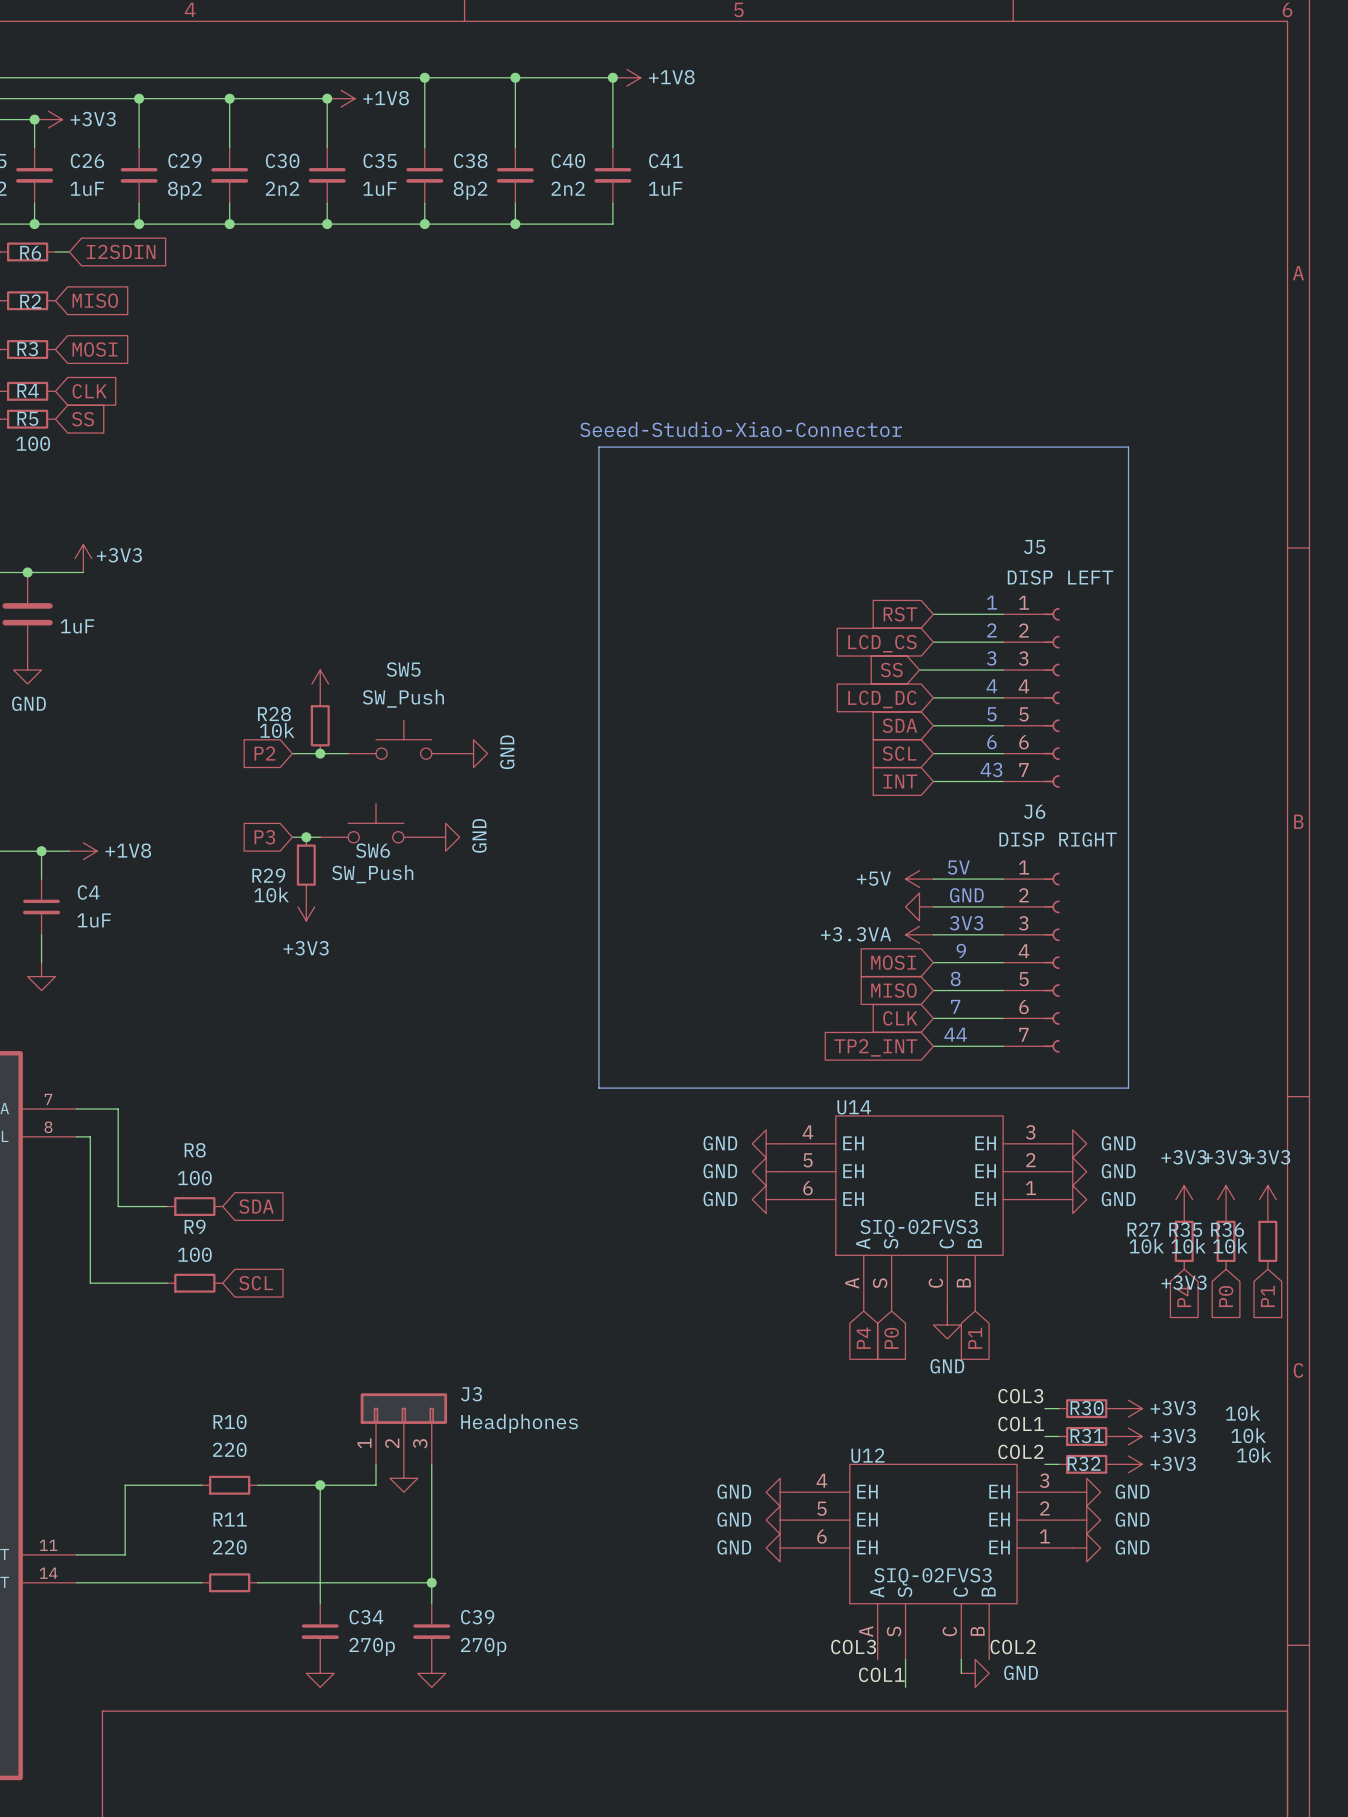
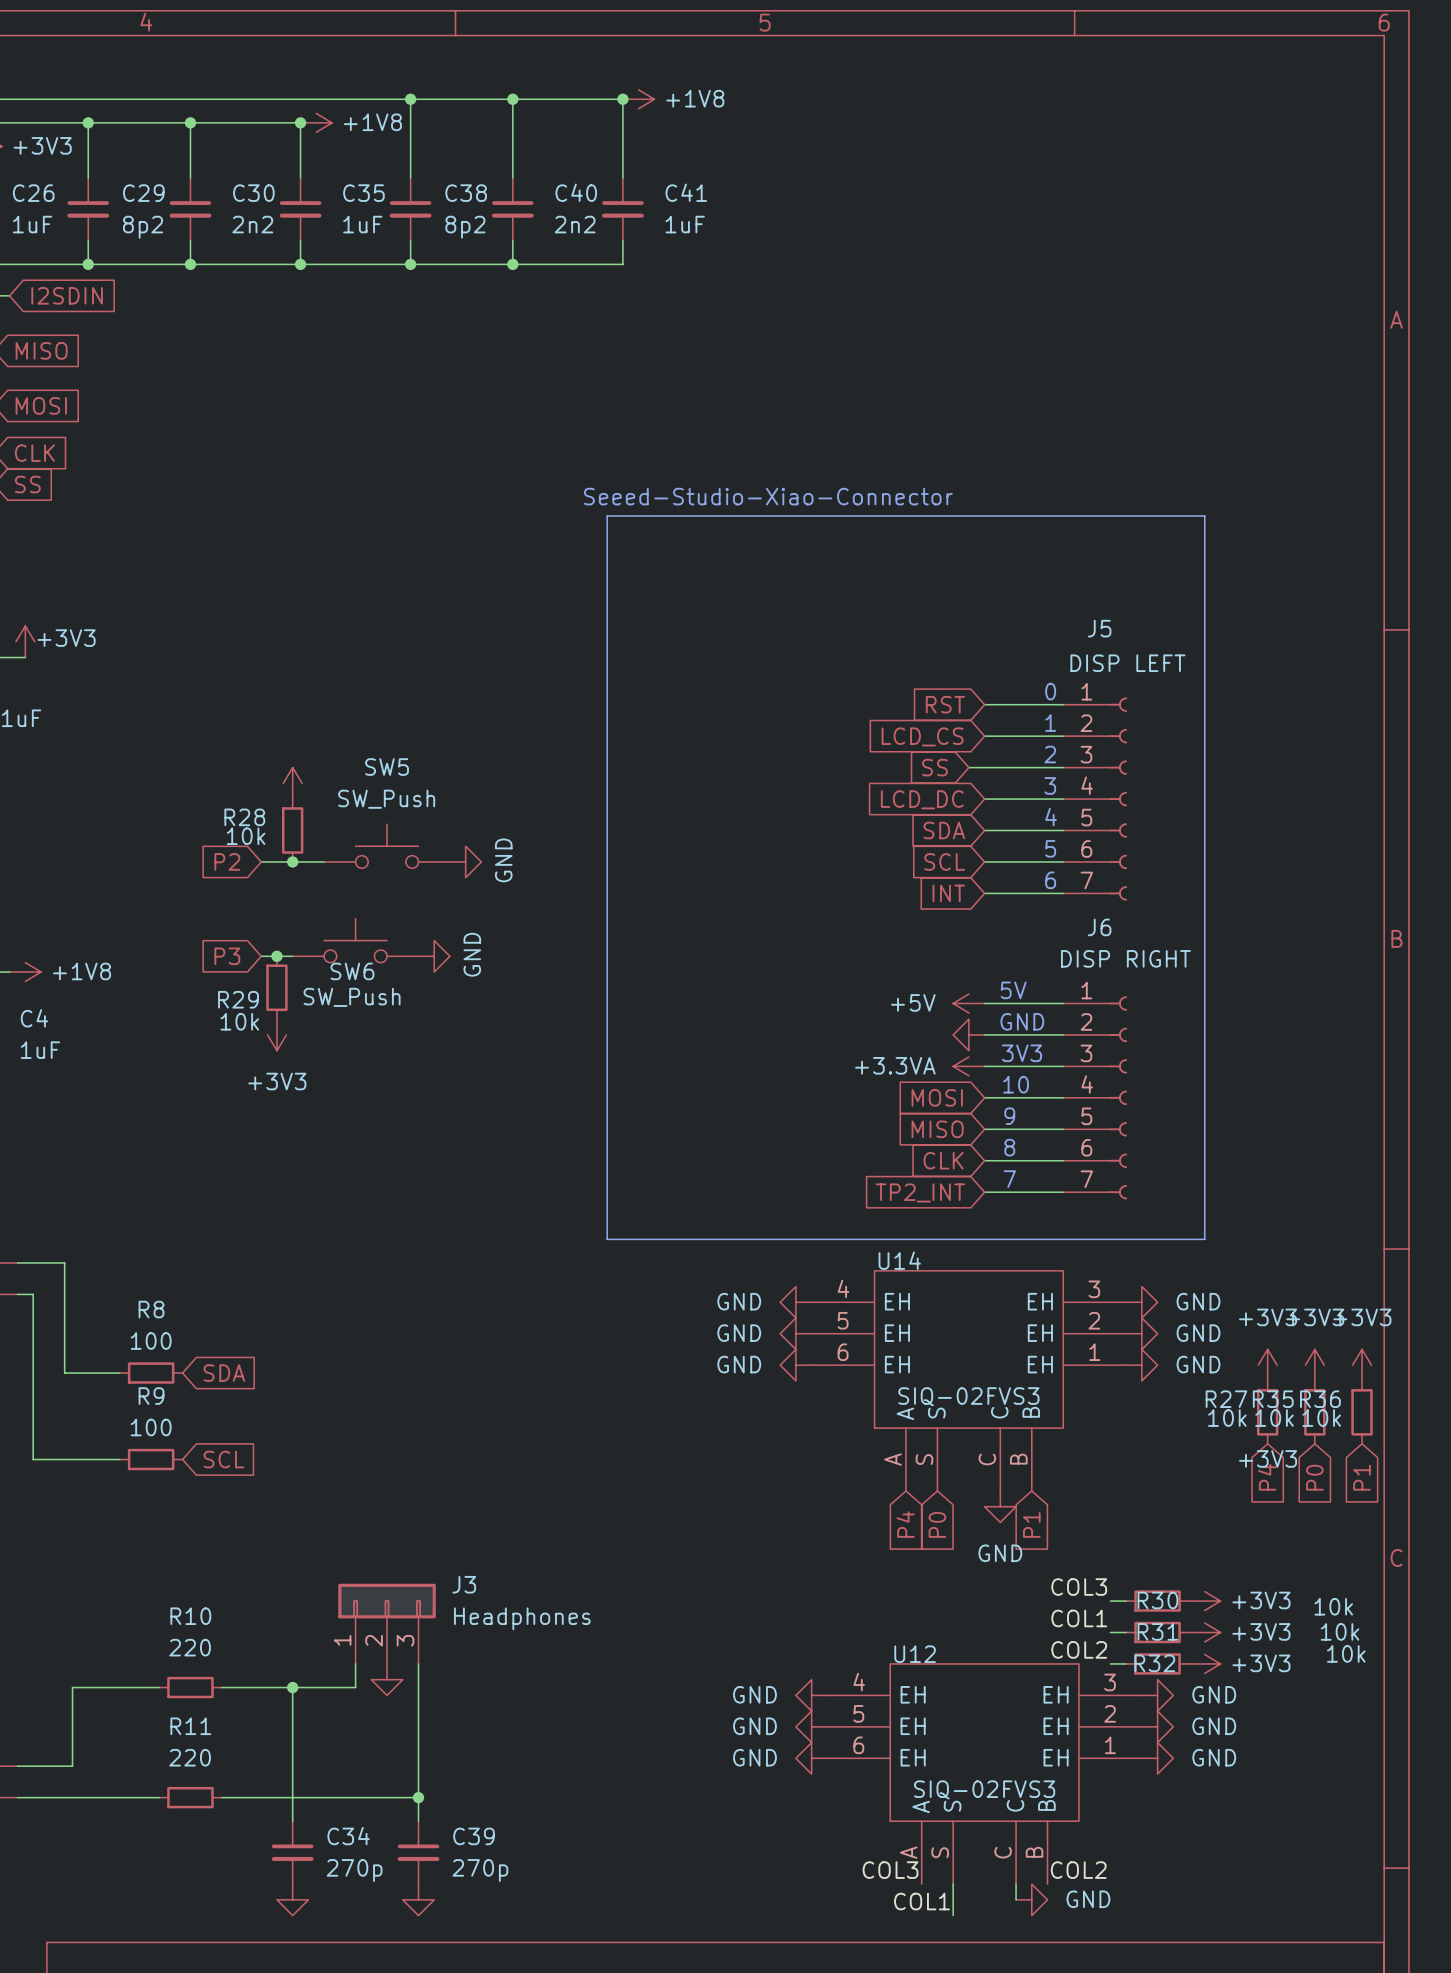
text: 1 (992, 602) -> 0 (1050, 691)
text: 2 (991, 630) -> 1 (1050, 723)
text: 3 (991, 658) -> 2 (1050, 754)
text: 4 (991, 686) -> 3 (1050, 785)
text: 5 (992, 714) -> 4 (1051, 817)
text: 6 (991, 742) -> 5 (1050, 848)
text: 43 (991, 769) -> 6 (1050, 880)
text: 9 (961, 950) -> 10 (1016, 1084)
text: 8 (955, 978) -> 9 (1009, 1116)
text: 7 (955, 1006) -> 8 (1009, 1147)
text: 44 (955, 1034) -> 7 (1009, 1179)

